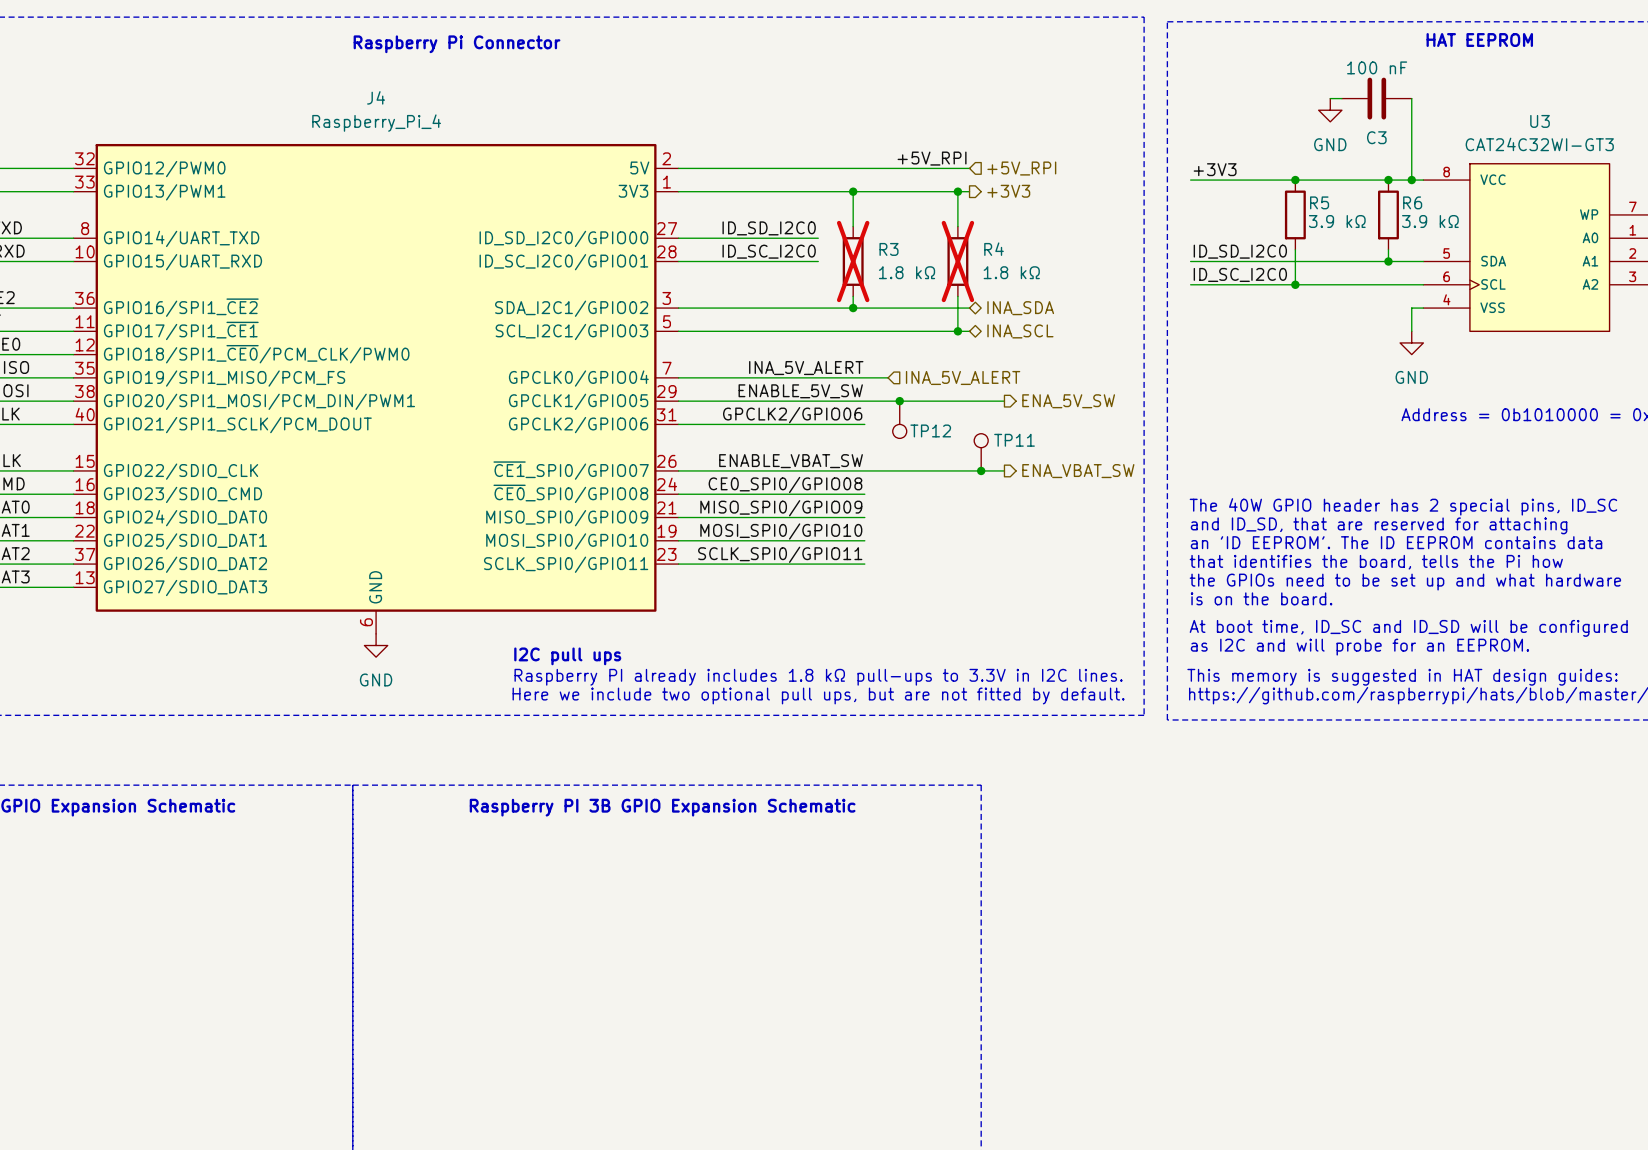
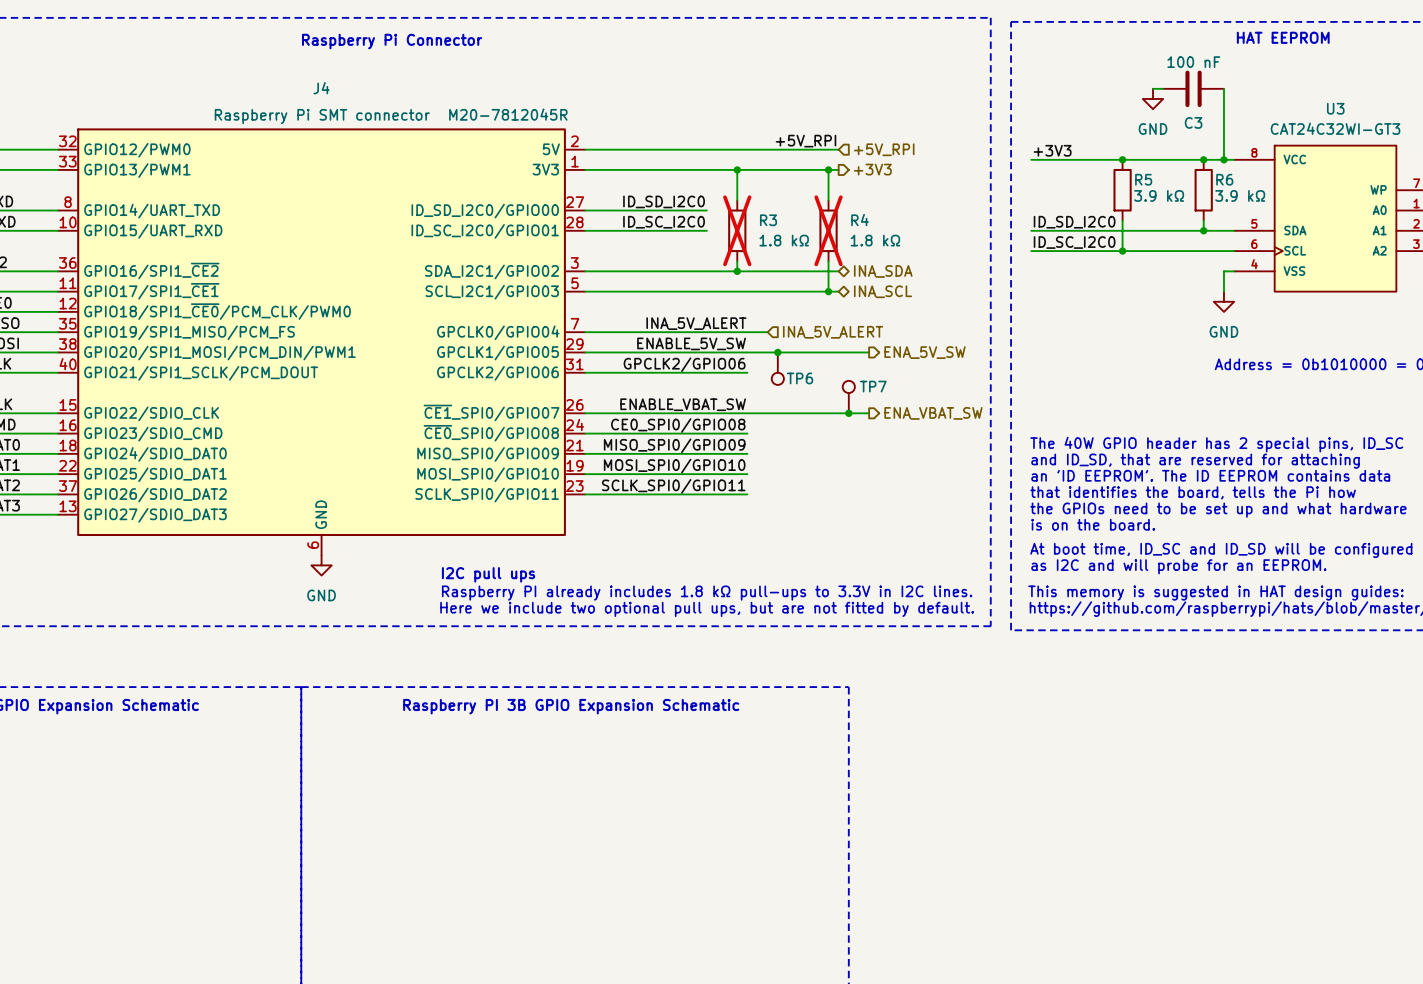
J4 value: Raspberry_Pi_4 (376, 123) -> Raspberry Pi SMT connector (322, 116)
J4 text: none -> M20-7812045R (508, 114)
TP12 name: TP12 (930, 430) -> TP6 (800, 378)
TP11 name: TP11 (1014, 440) -> TP7 (873, 386)

